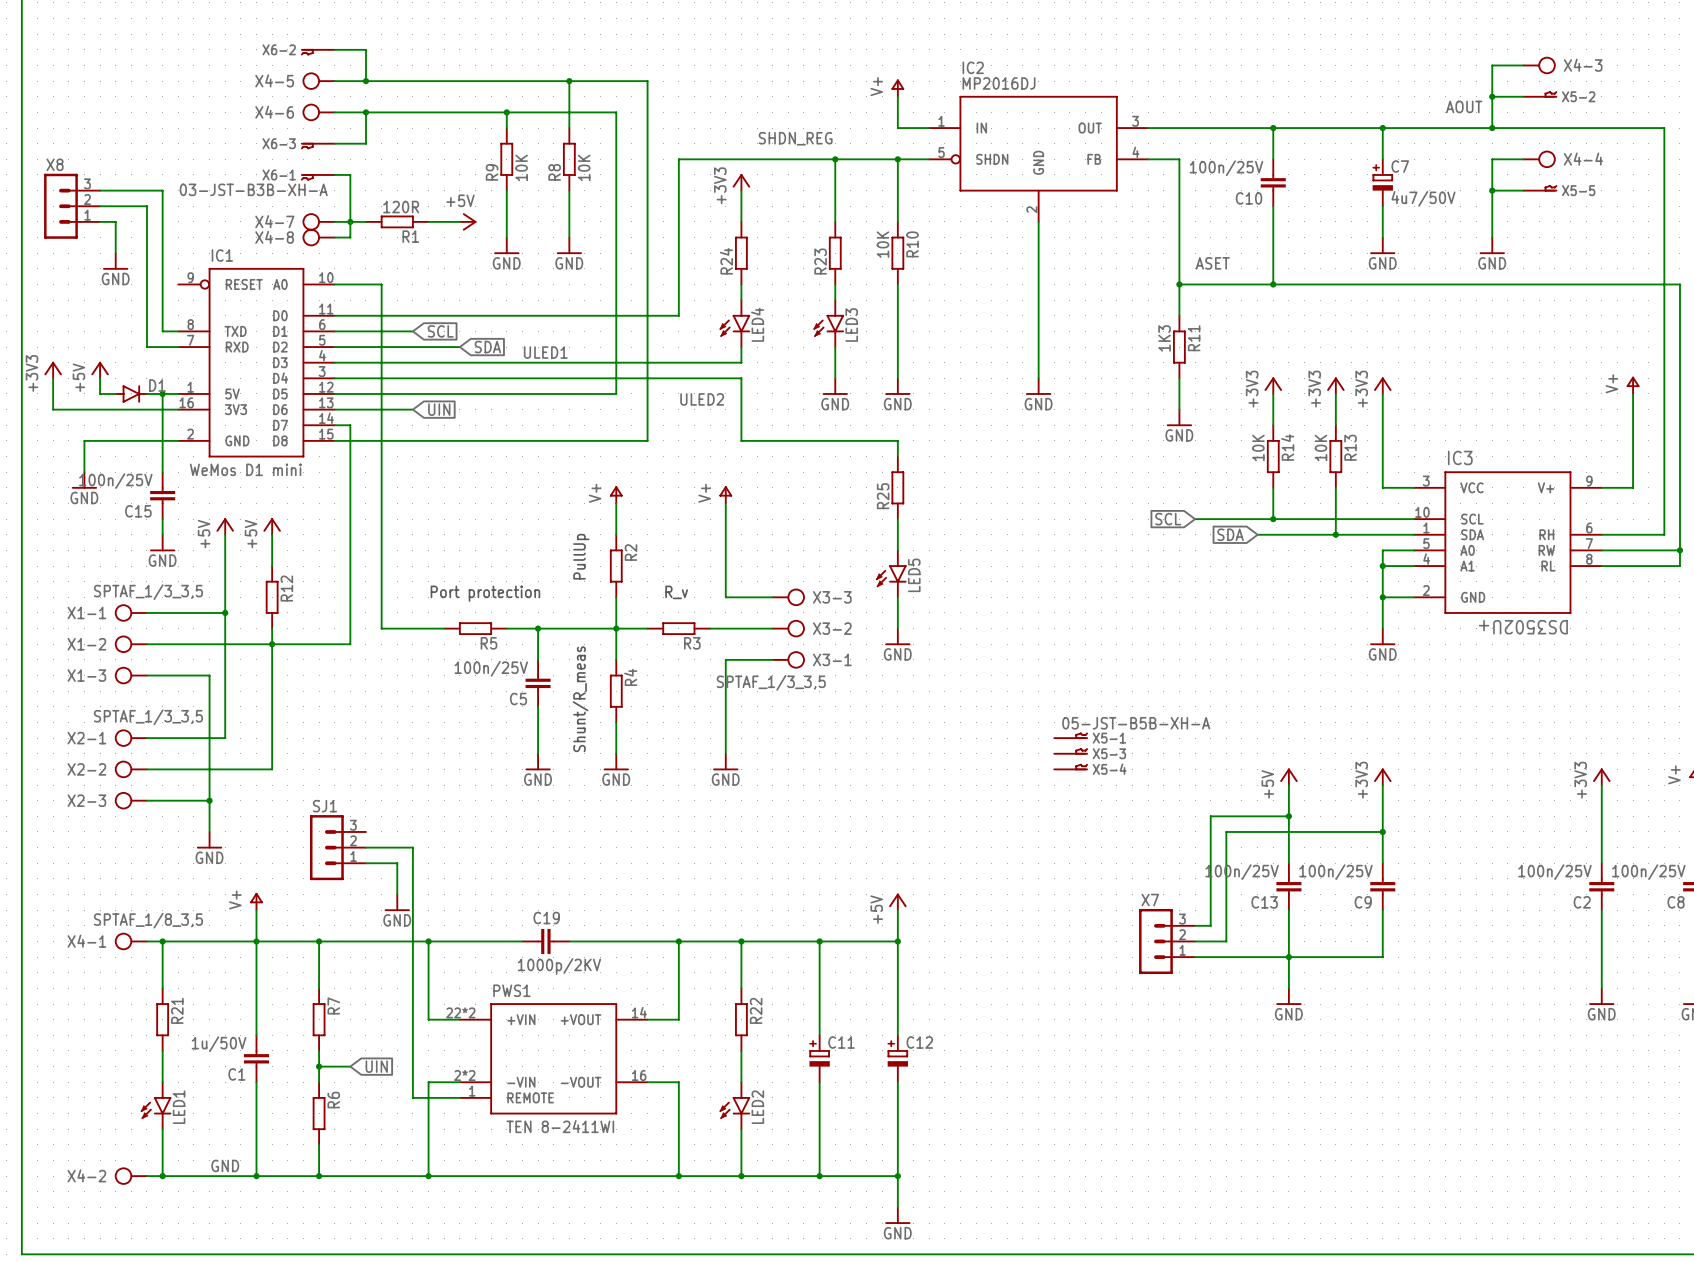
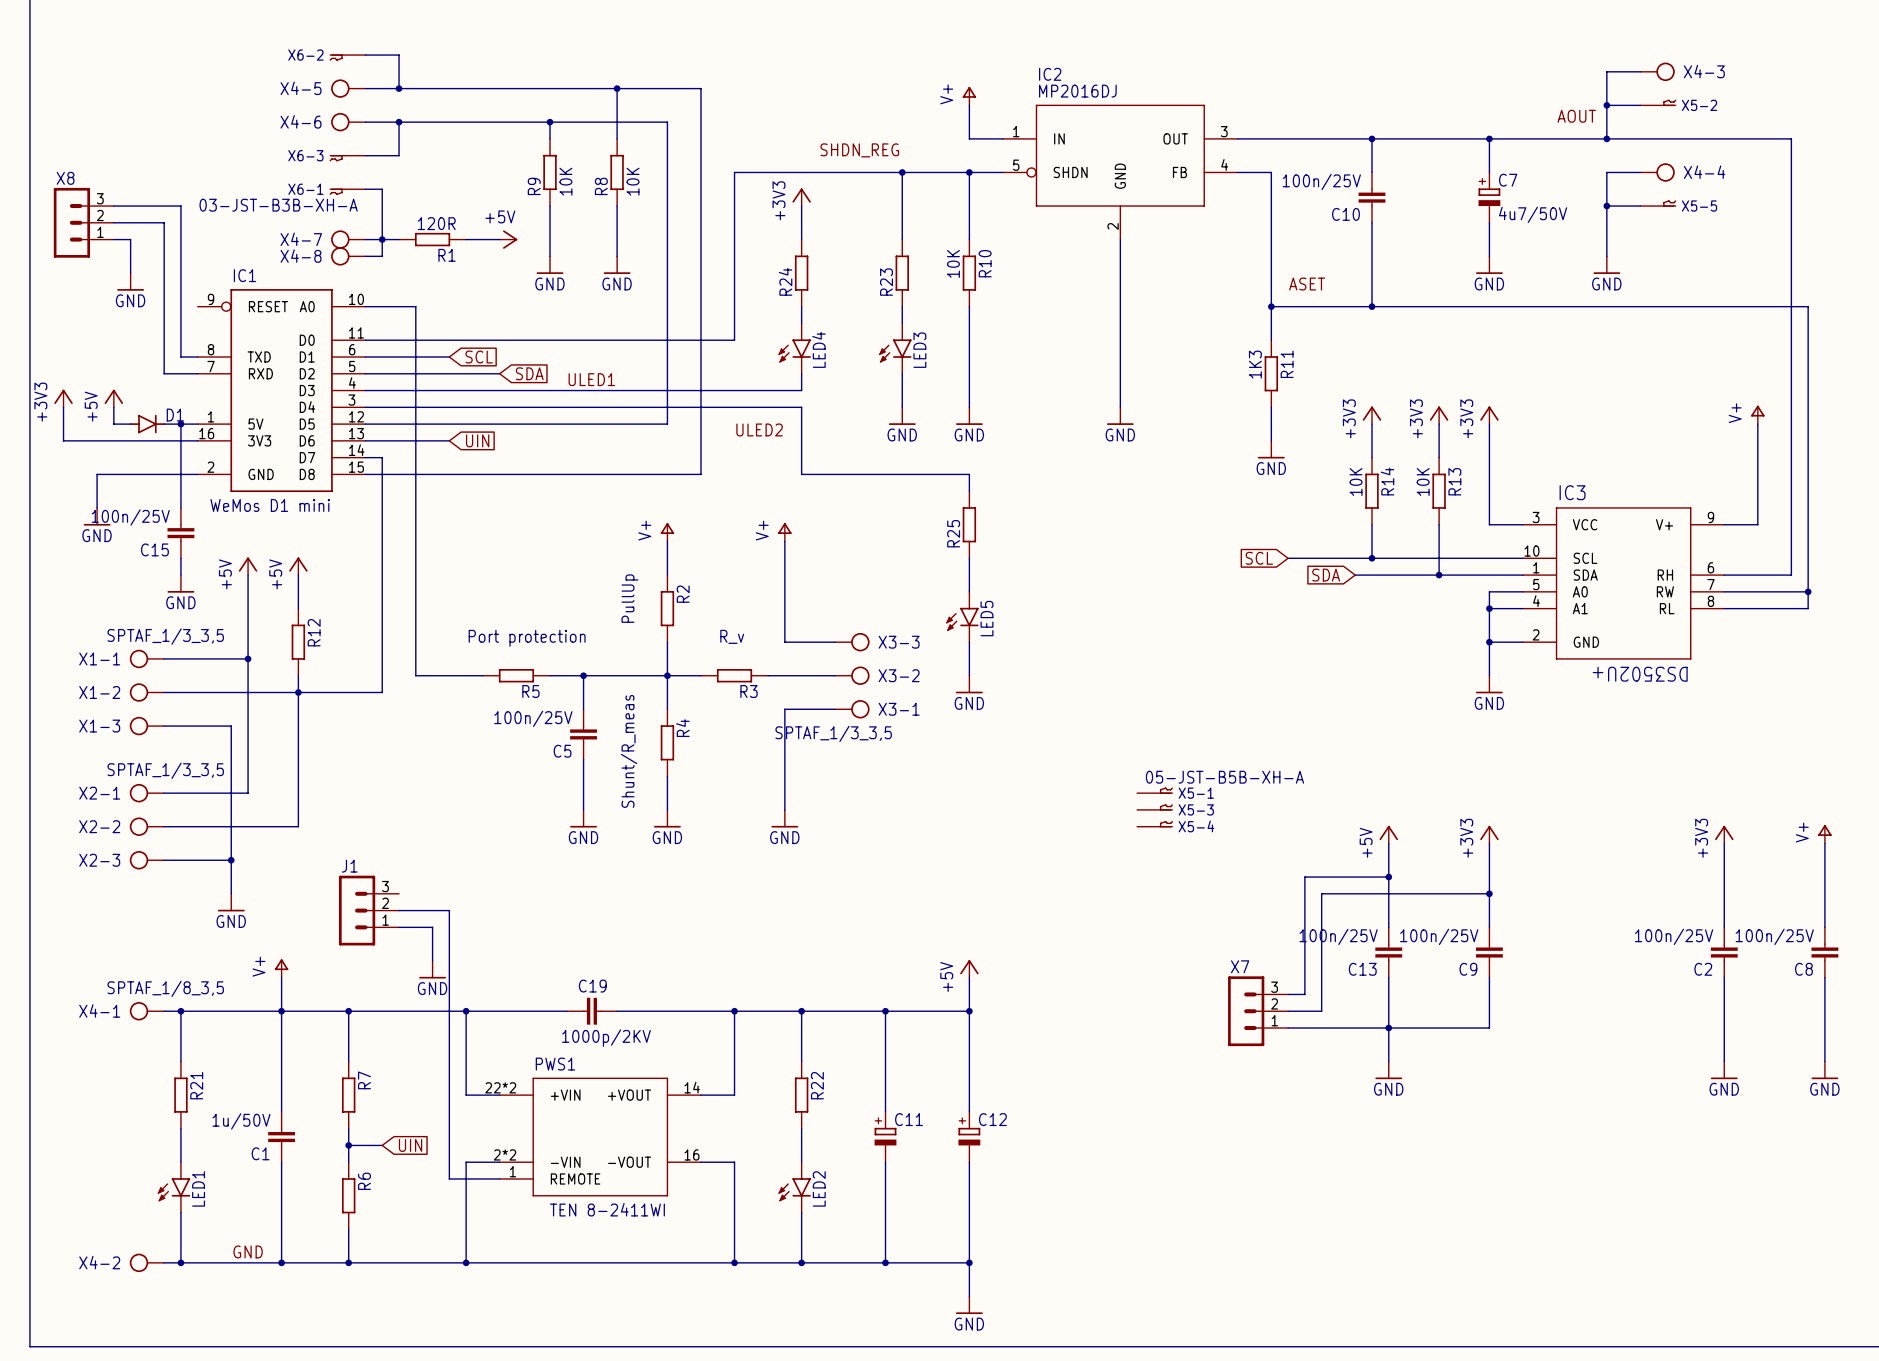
SJ1 name: SJ1 (324, 806) -> J1 (349, 866)

